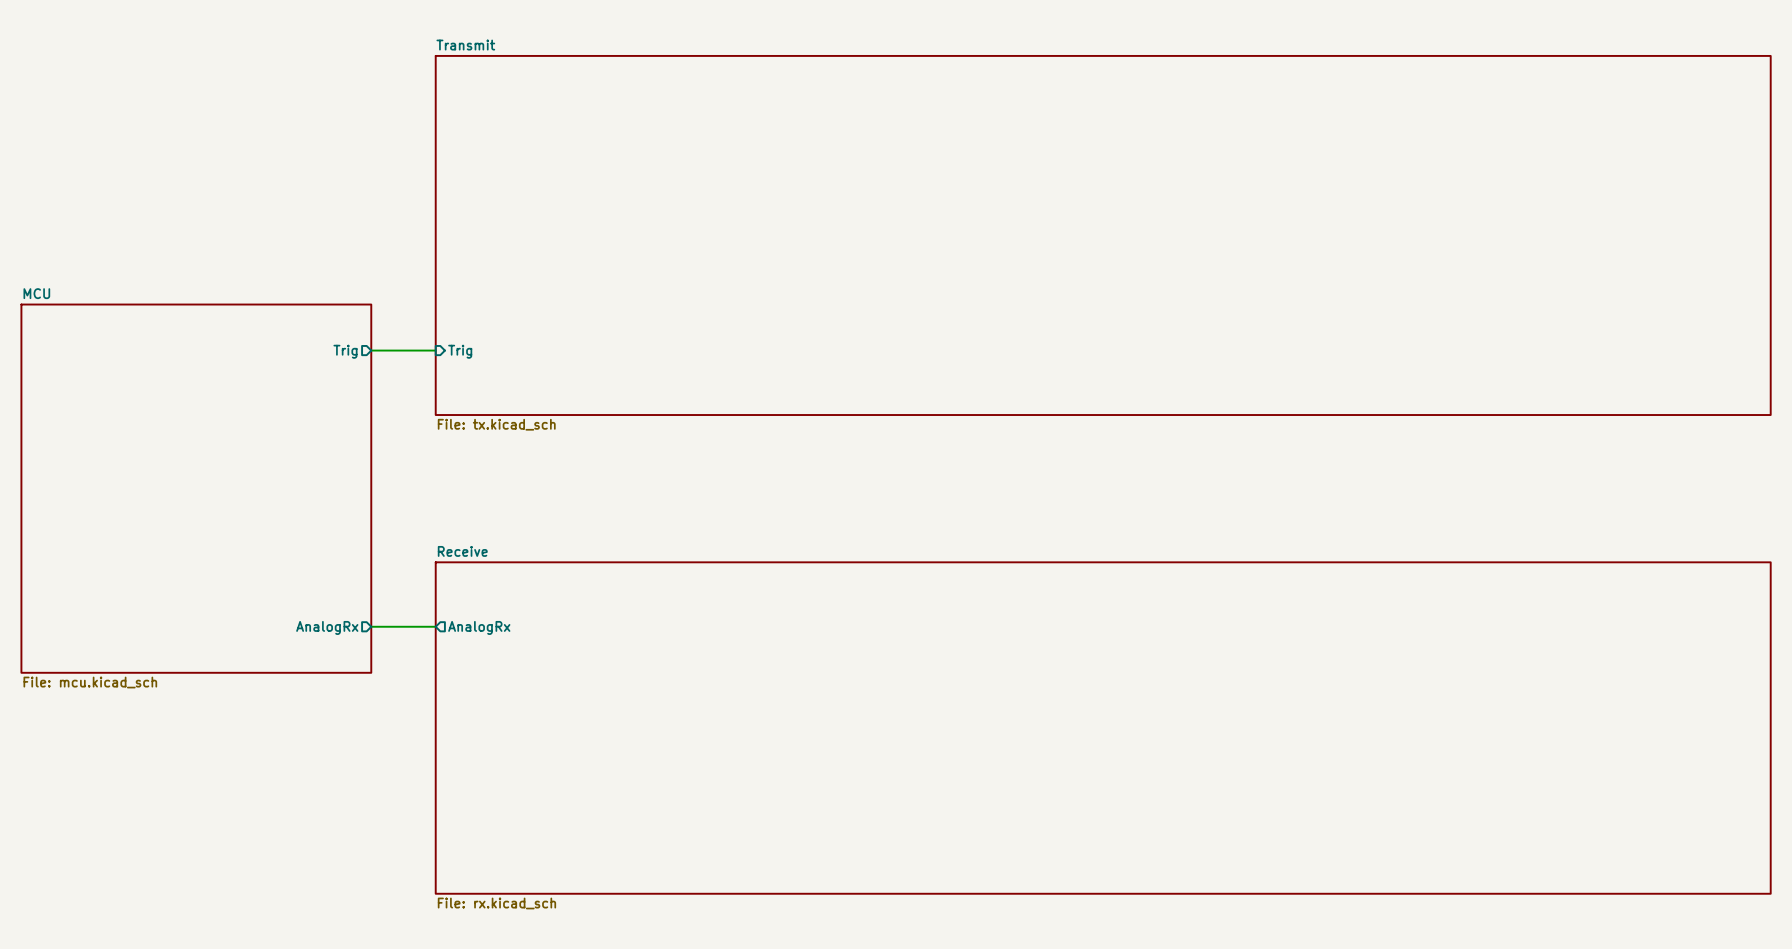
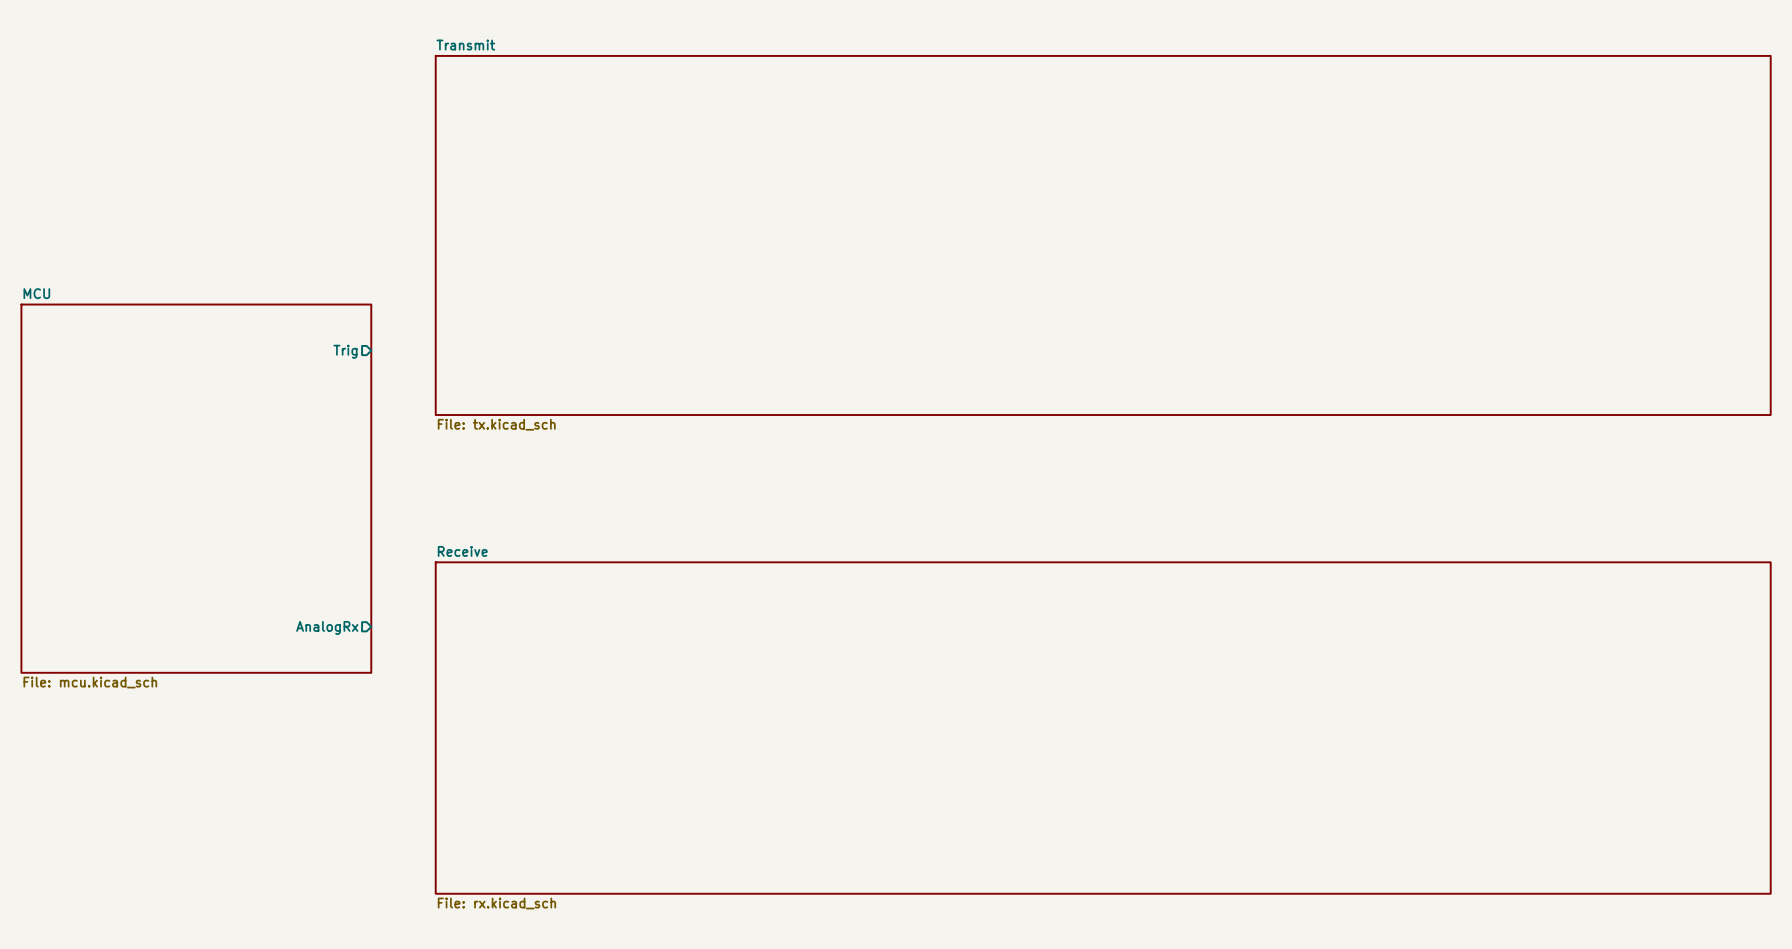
wire: (371, 350) (435, 350) -> none
sheet pin: Trig (460, 351) -> none
wire: (371, 626) (435, 626) -> none
sheet pin: AnalogRx (479, 627) -> none

